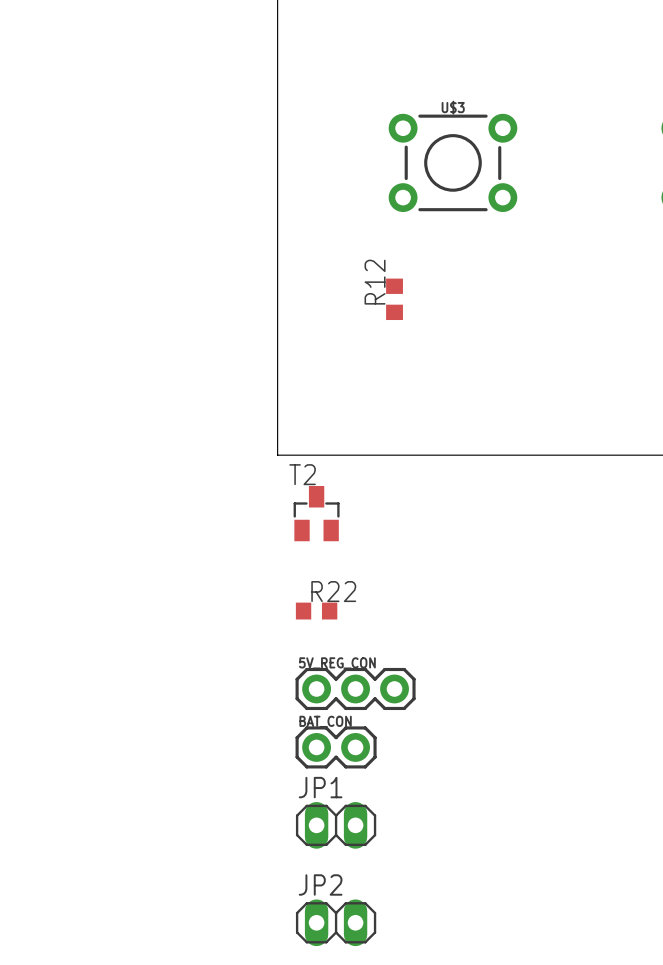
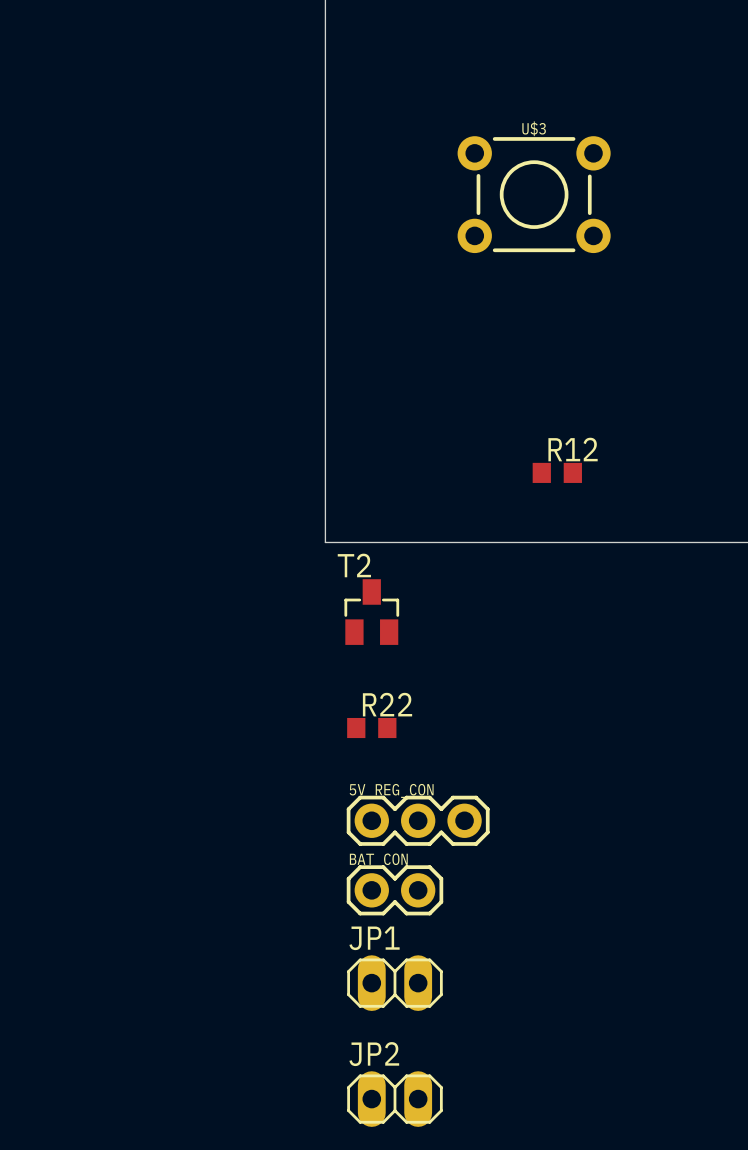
R12 rotation: 0° (394, 299) -> 90° clockwise (557, 472)
R12 position: (394, 299) -> (557, 472)

